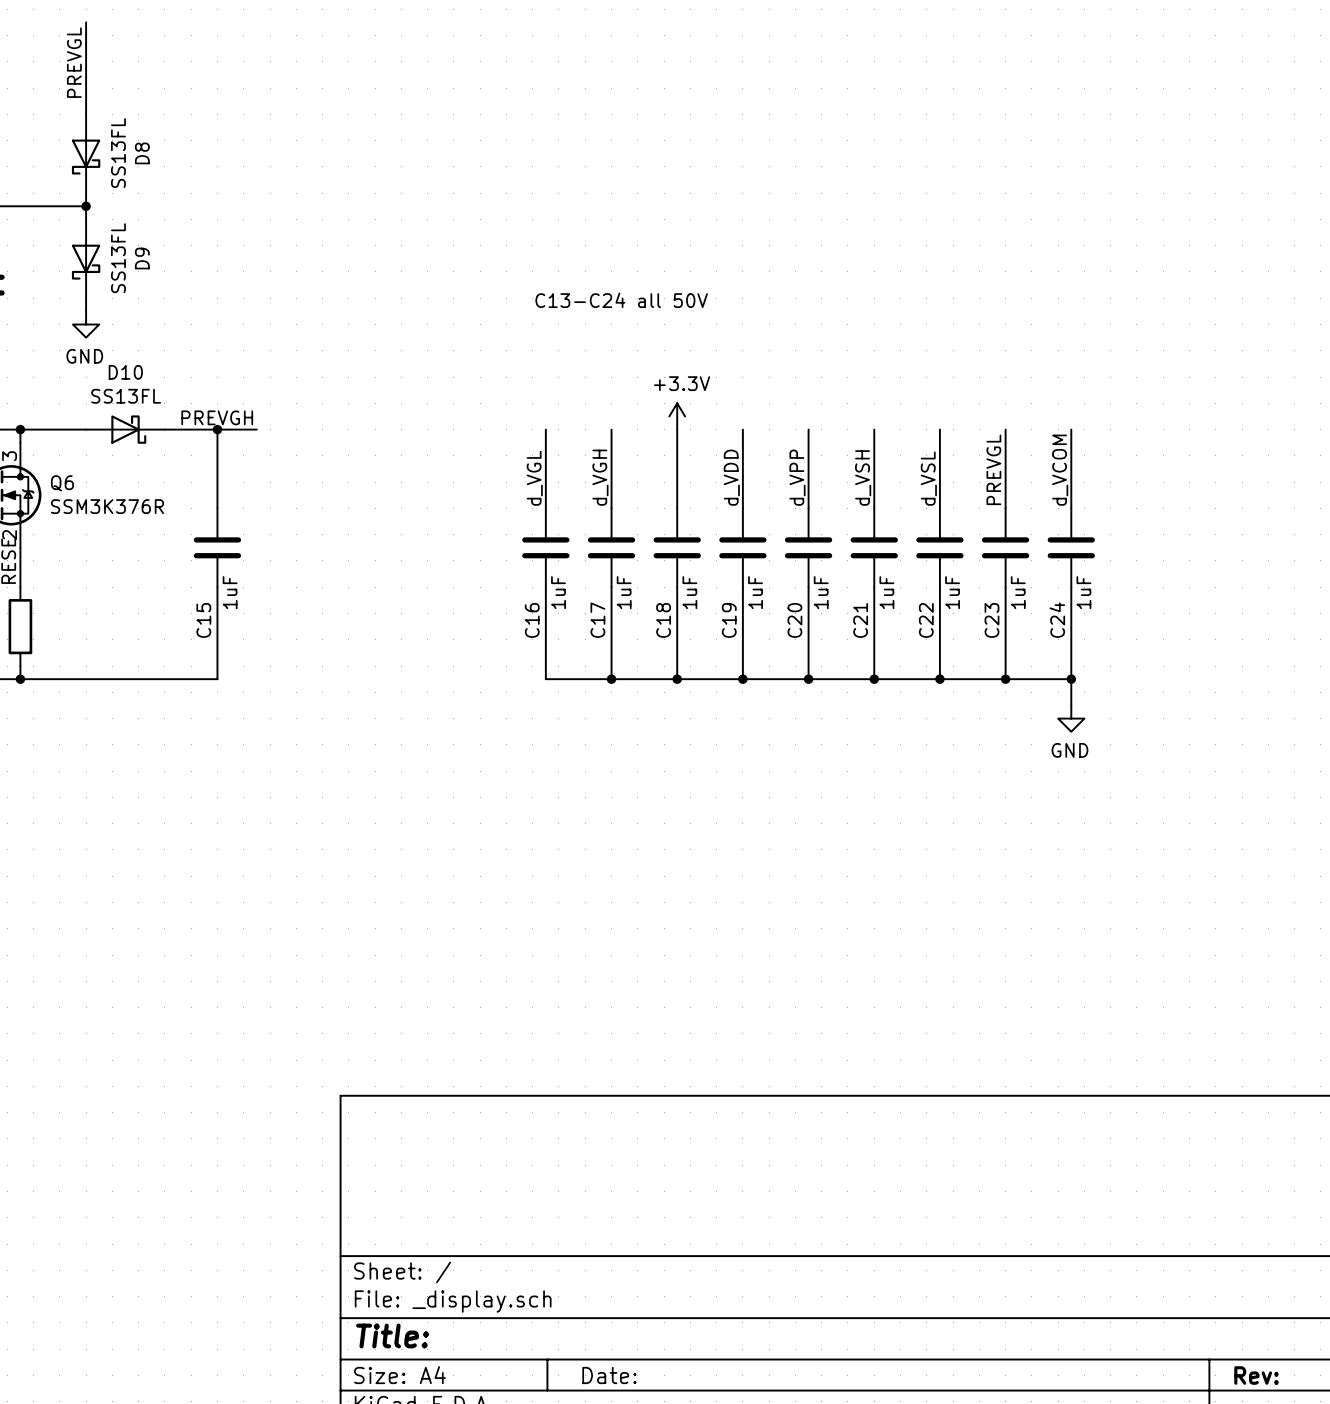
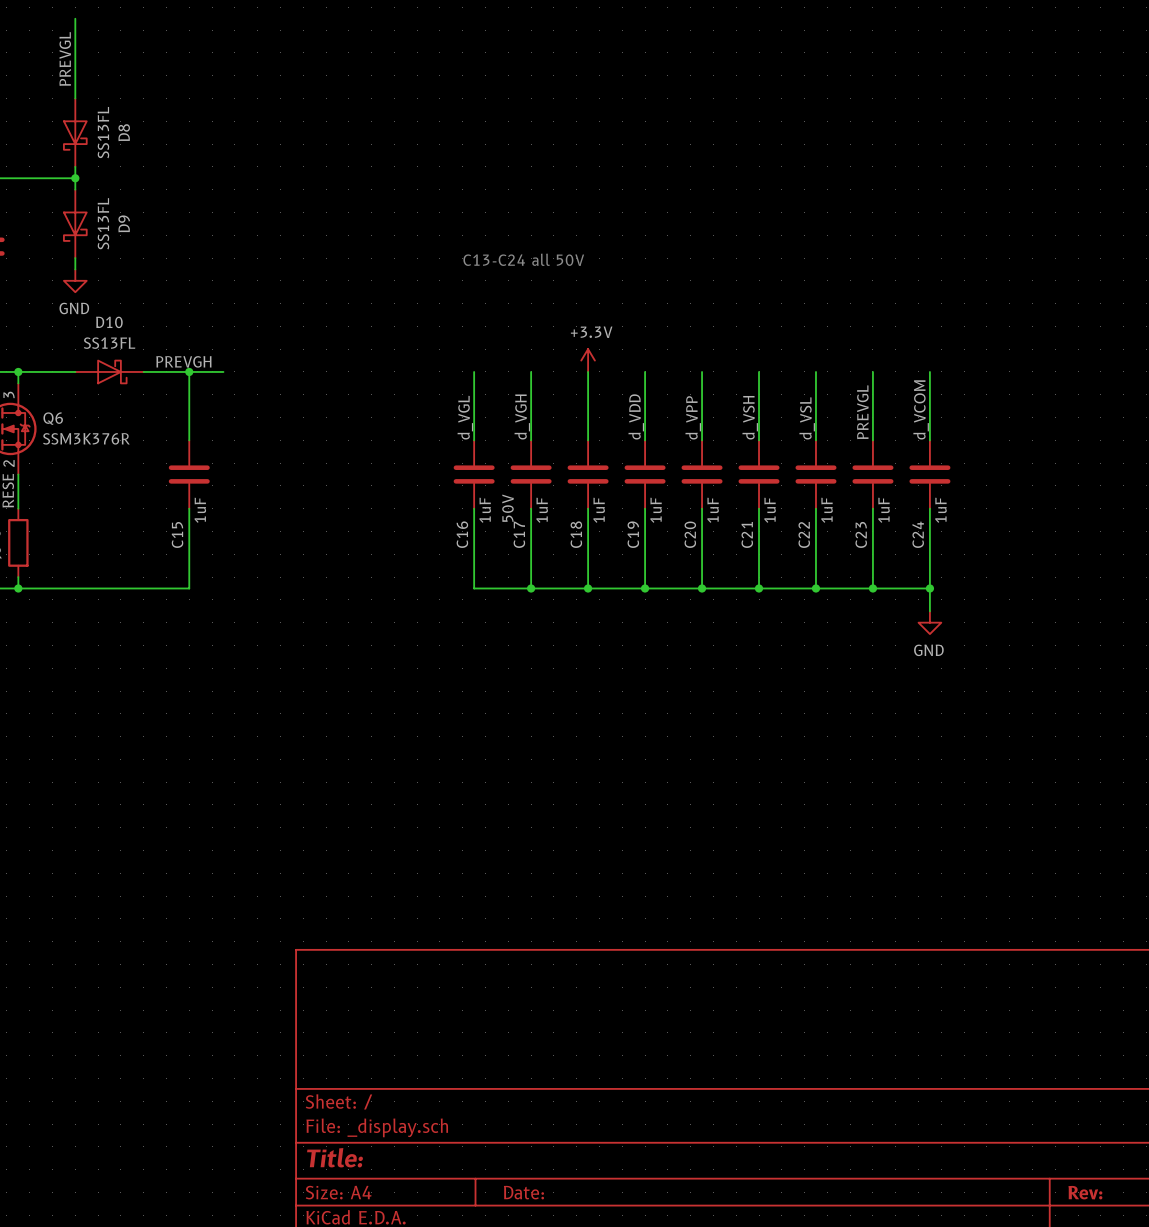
C16 text: none -> 50V (507, 508)

